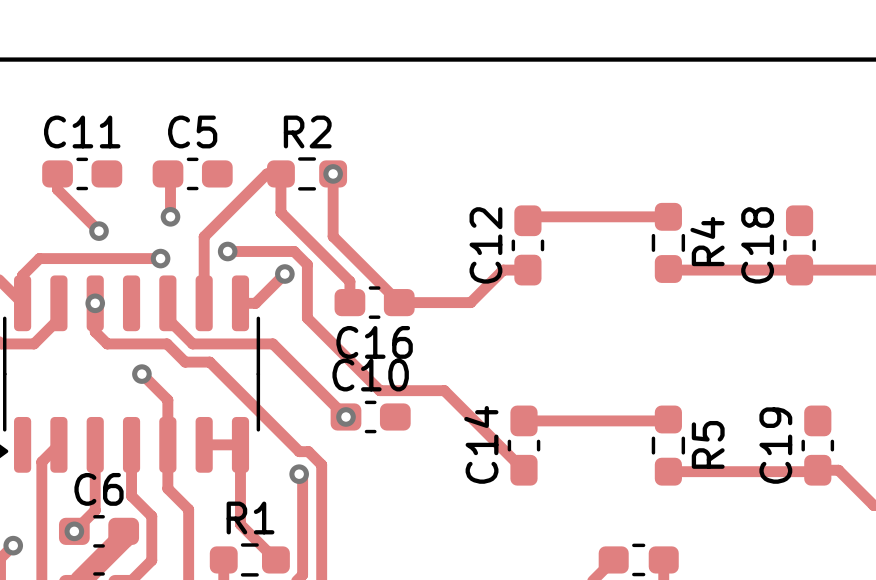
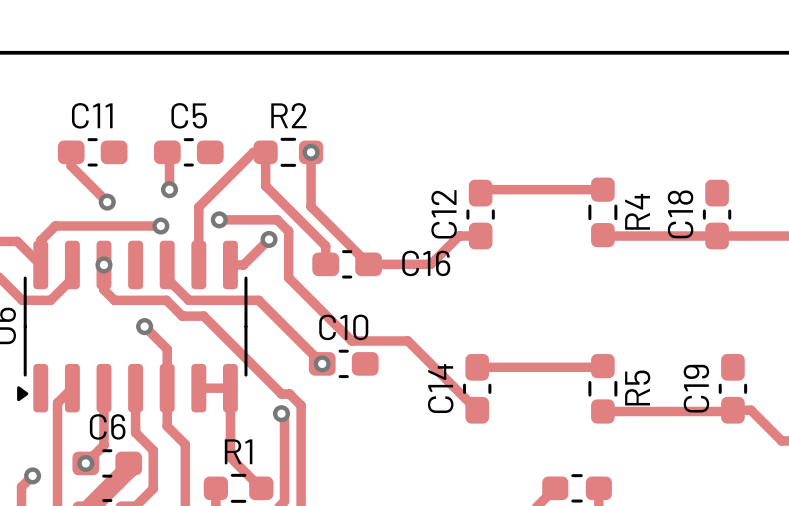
C16 name position: C16 (374, 342) -> C16 (426, 263)

